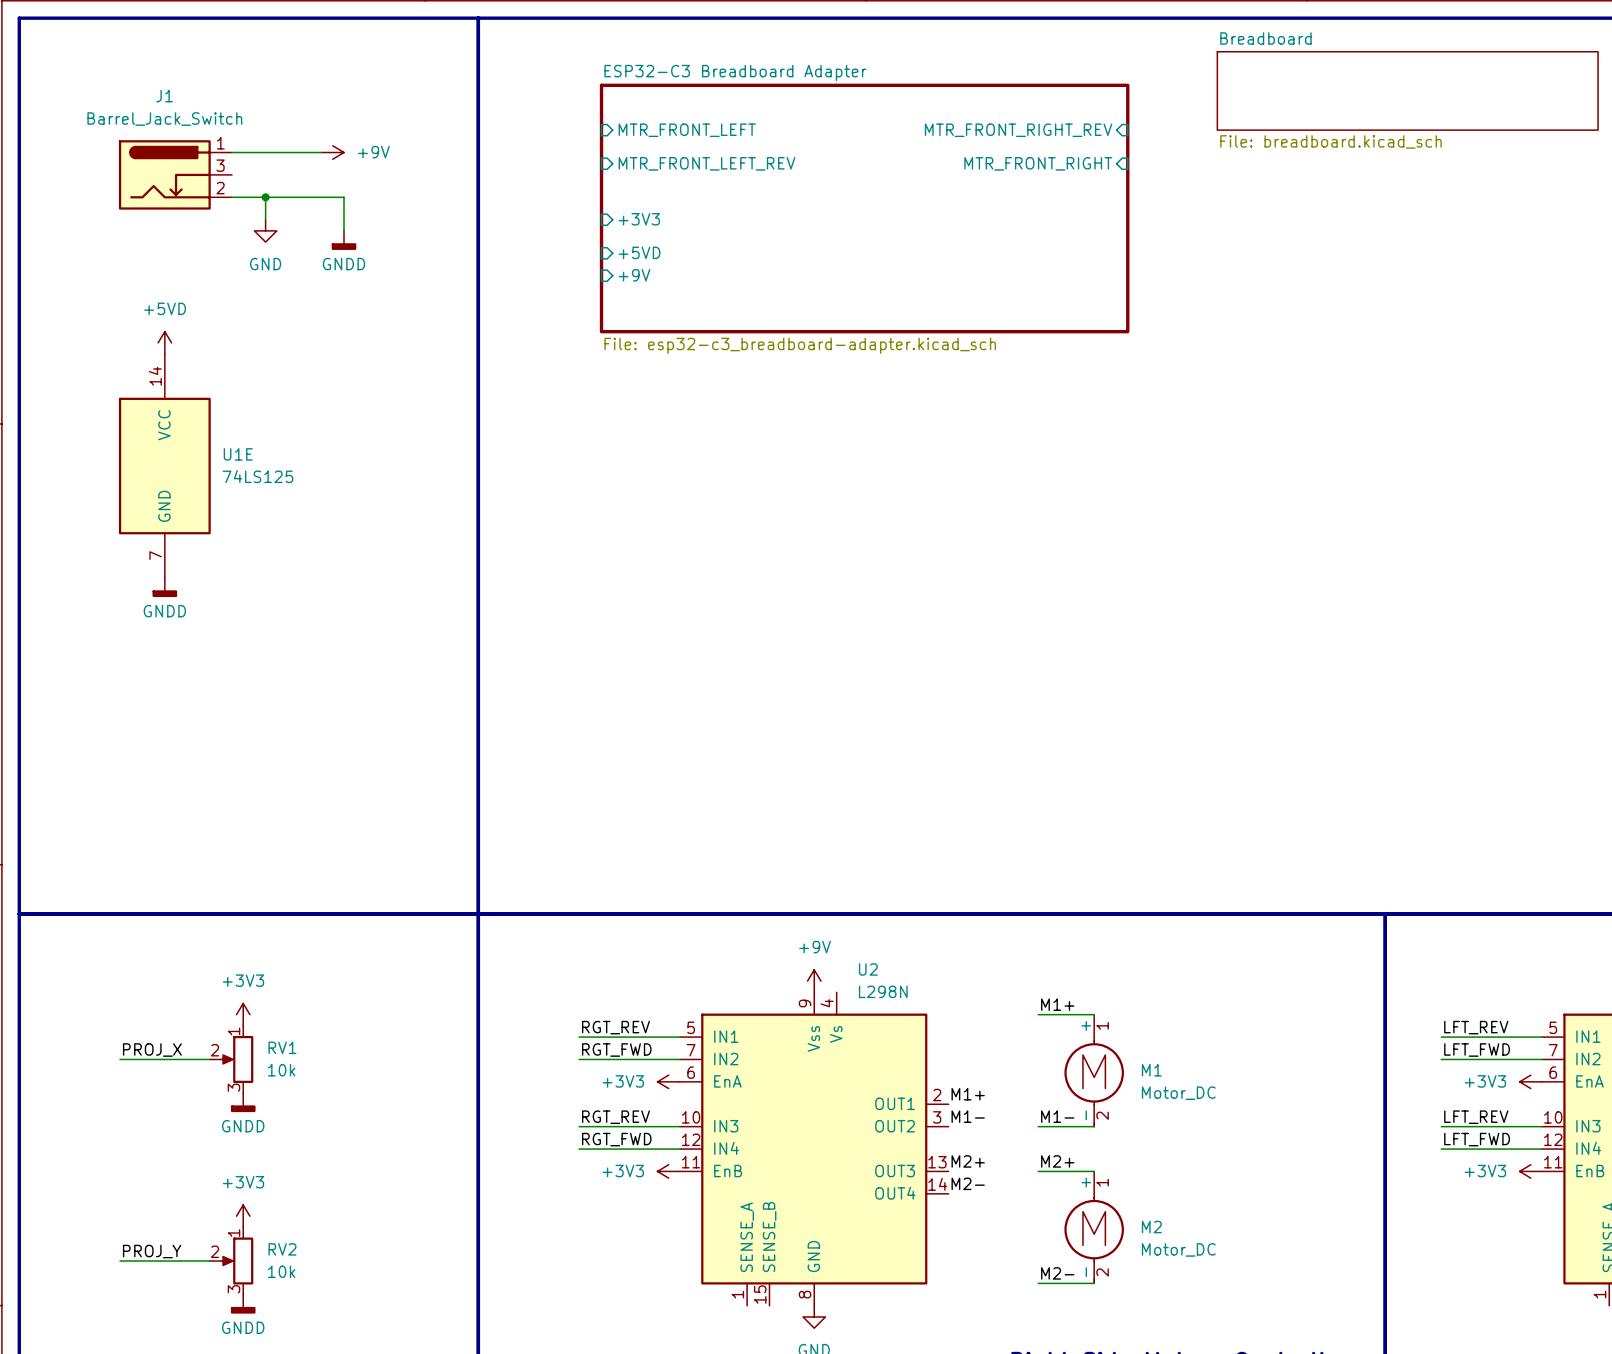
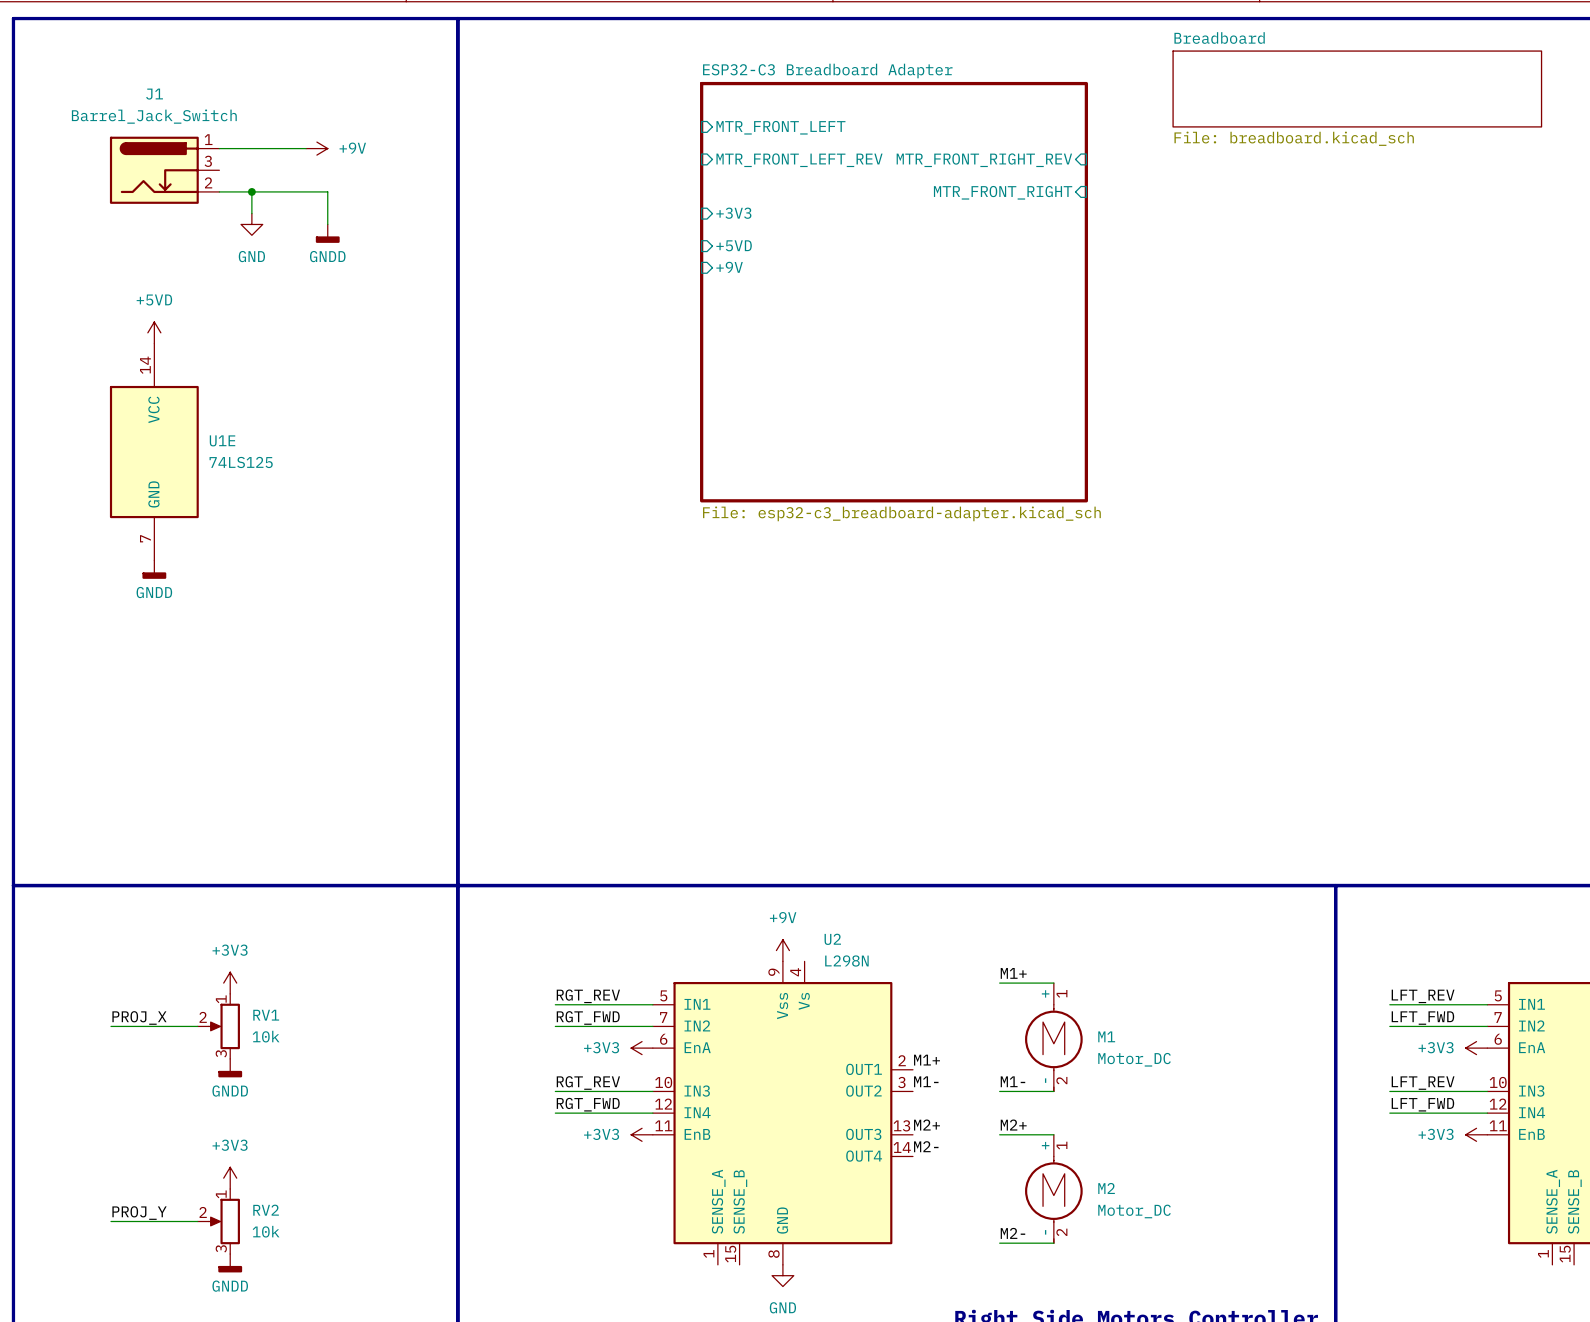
sheet ESP32-C3 Breadboard Adapter name position: ESP32-C3 Breadboard Adapter (735, 72) -> ESP32-C3 Breadboard Adapter (827, 71)
sheet ESP32-C3 Breadboard Adapter shape: [599, 83, 1130, 334] -> [700, 81, 1089, 503]
sheet pin position: MTR_FRONT_LEFT (687, 130) -> MTR_FRONT_LEFT (780, 127)
sheet pin: MTR_FRONT_RIGHT_REV (1018, 130) -> none
sheet pin position: MTR_FRONT_LEFT_REV (707, 163) -> MTR_FRONT_LEFT_REV (799, 160)
sheet pin: MTR_FRONT_RIGHT (1038, 163) -> MTR_FRONT_RIGHT_REV (984, 160)
sheet pin: none -> MTR_FRONT_RIGHT (1003, 192)
sheet pin position: +3V3 (639, 219) -> +3V3 (733, 213)
sheet pin position: +5VD (639, 252) -> +5VD (734, 245)
sheet pin position: +9V (634, 275) -> +9V (729, 267)
sheet ESP32-C3 Breadboard Adapter value position: File: esp32-c3_breadboard-adapter.kicad_sch (800, 345) -> File: esp32-c3_breadboard-adapter.kicad_sch (901, 513)

